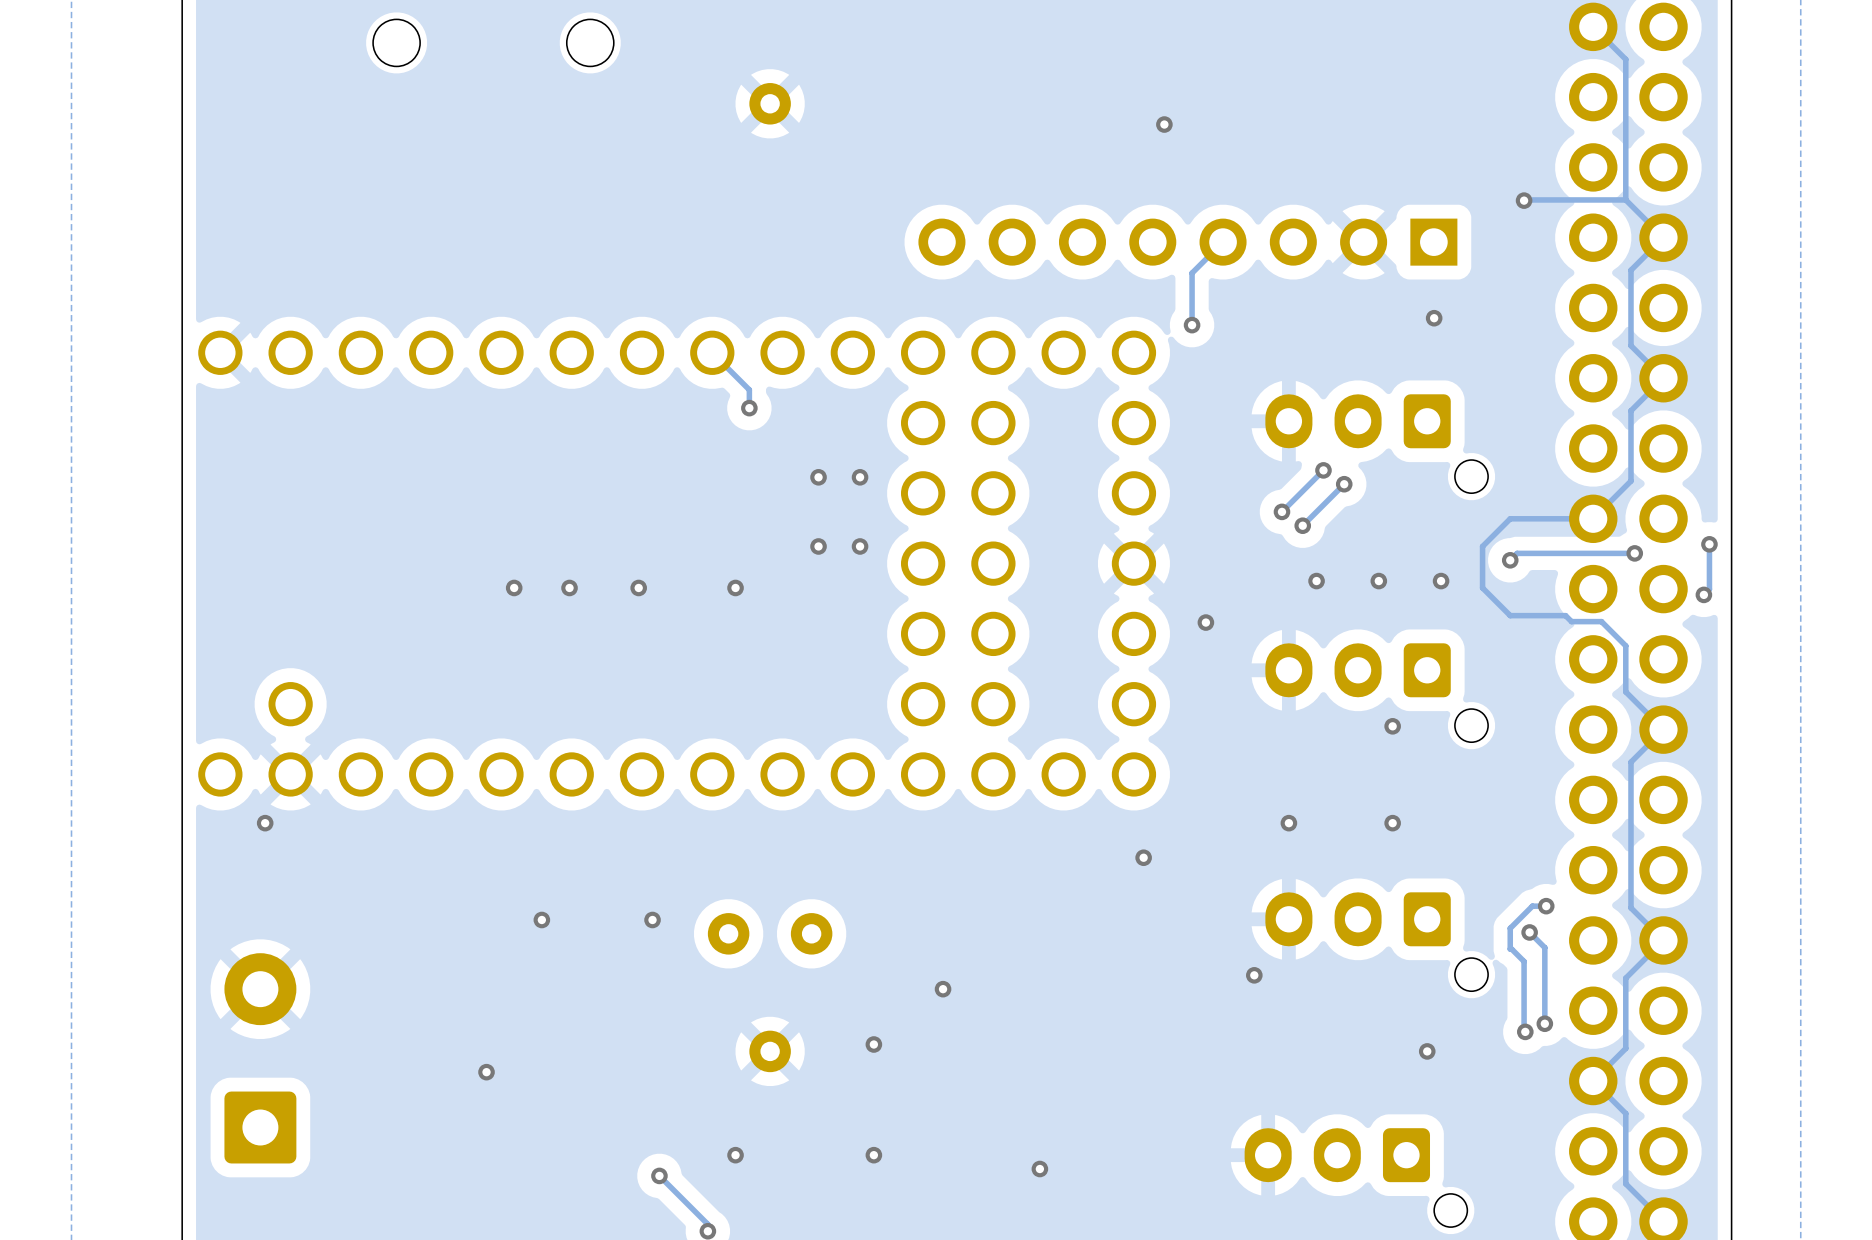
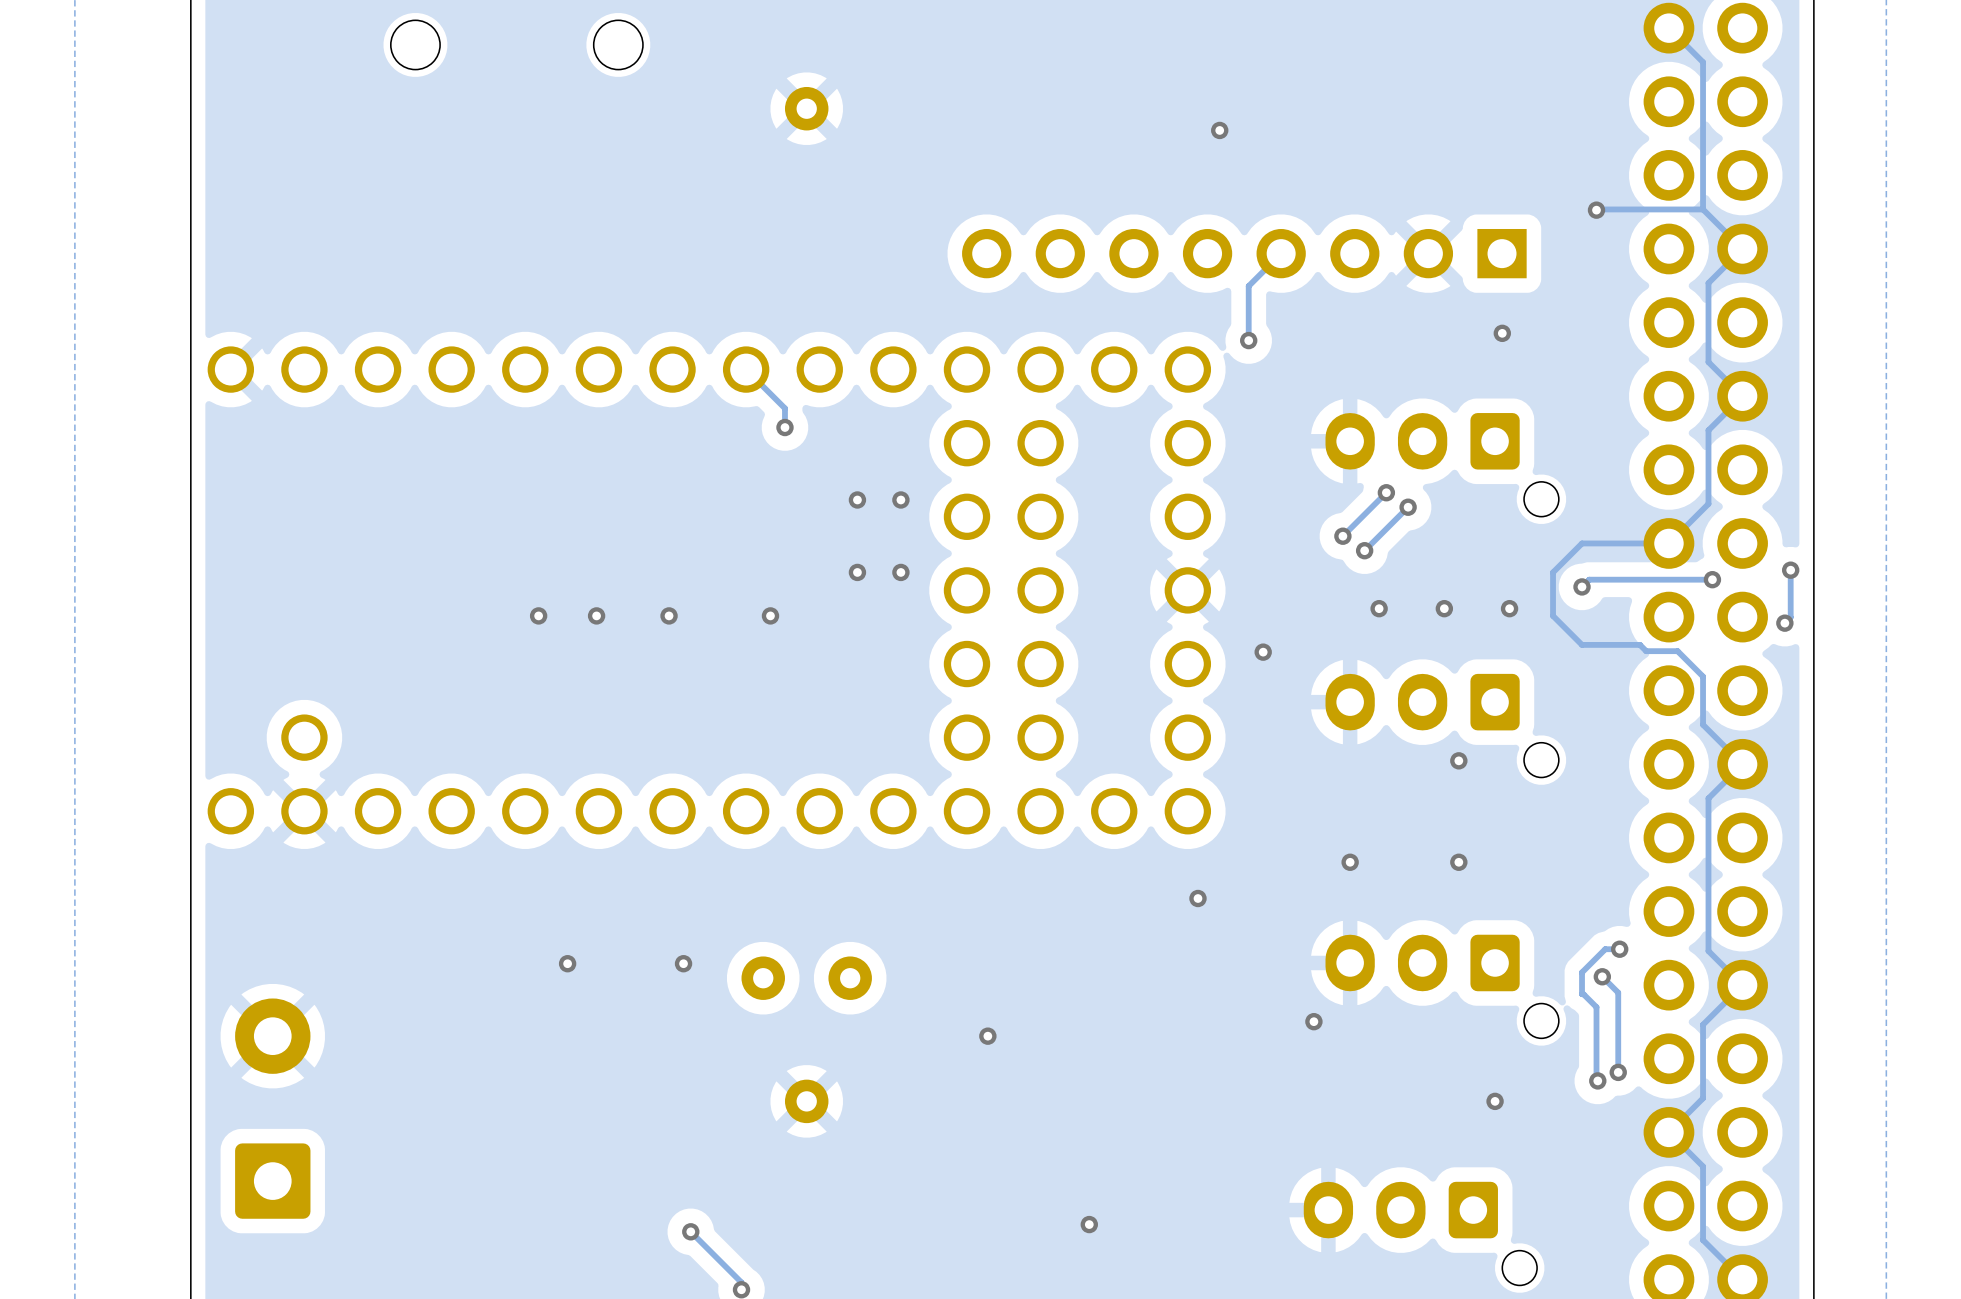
via: (265, 823) -> none
via: (873, 1044) -> none
via: (486, 1072) -> none
via: (735, 1155) -> none
via: (873, 1155) -> none

